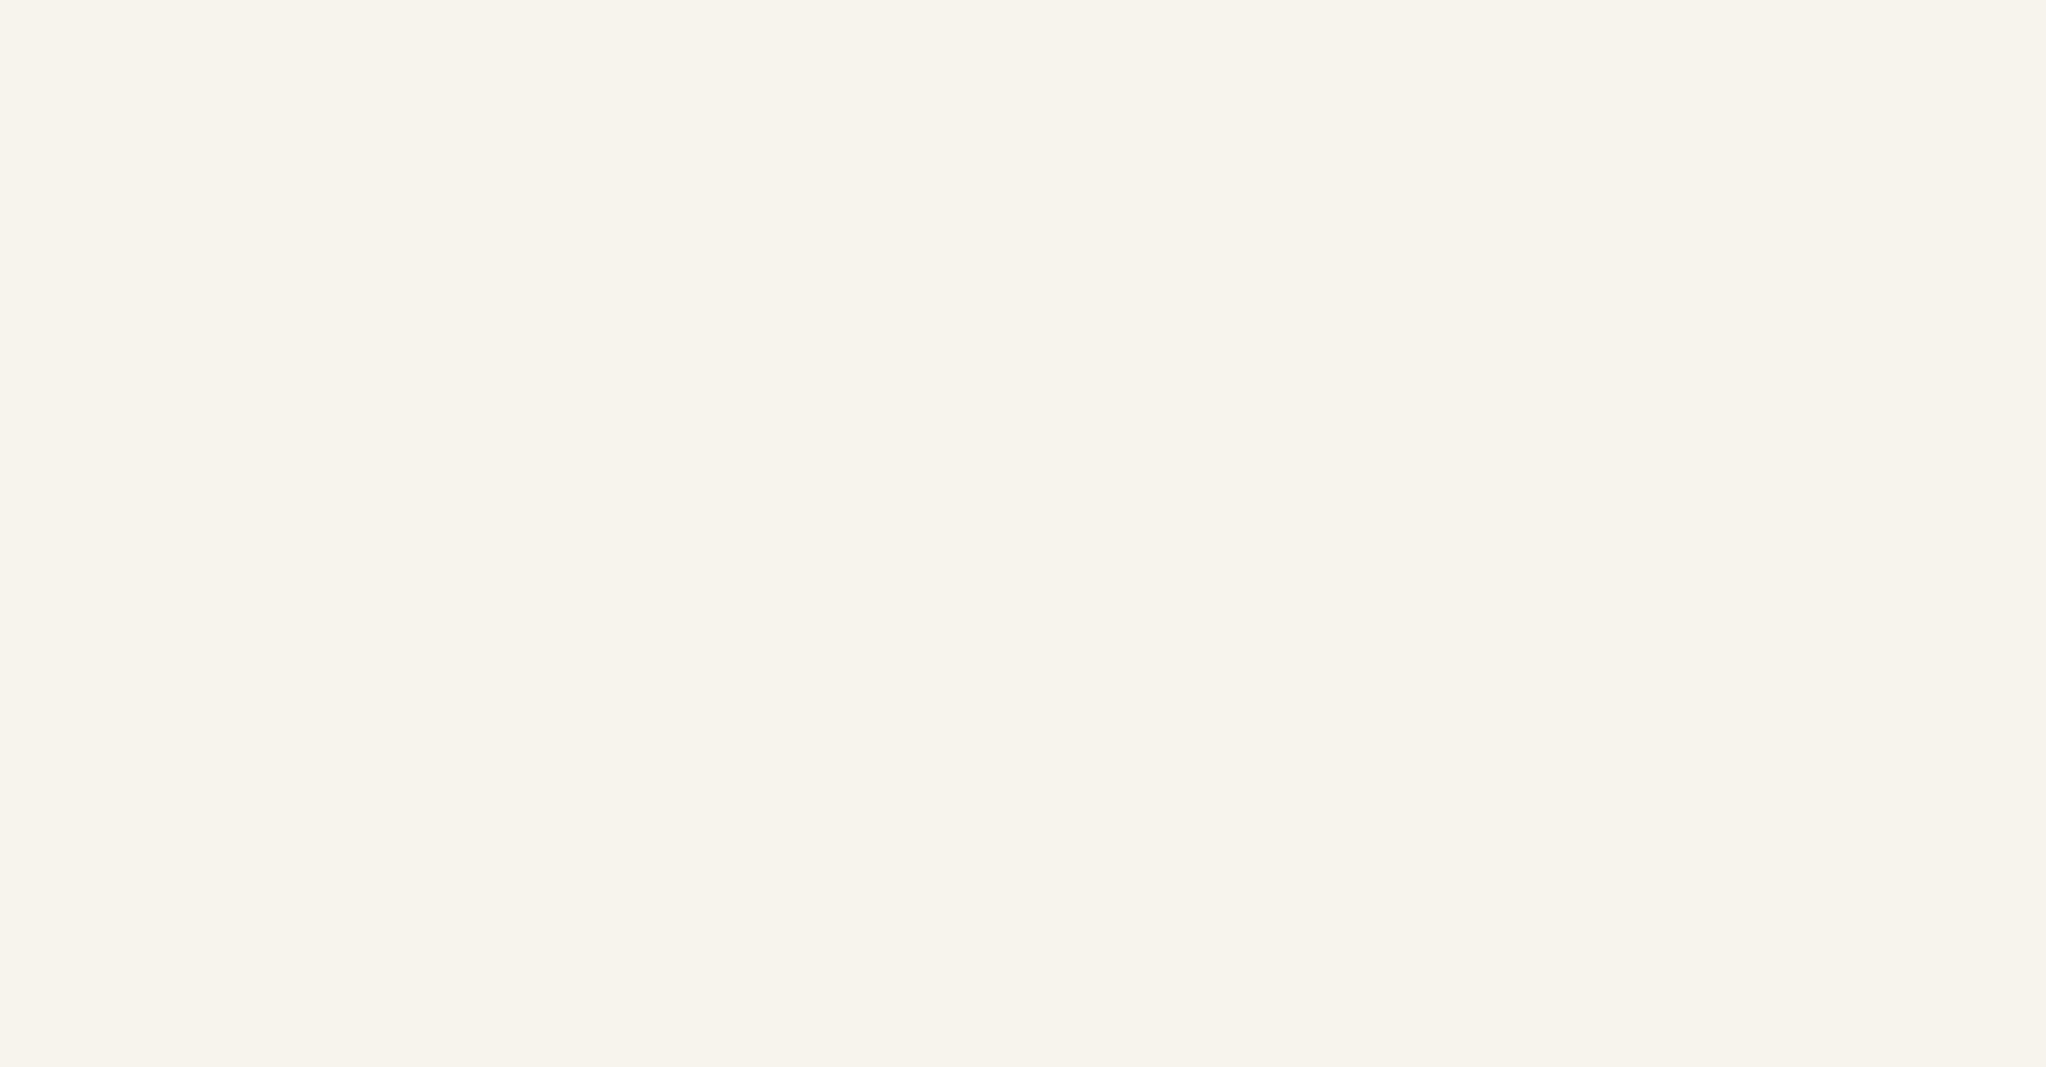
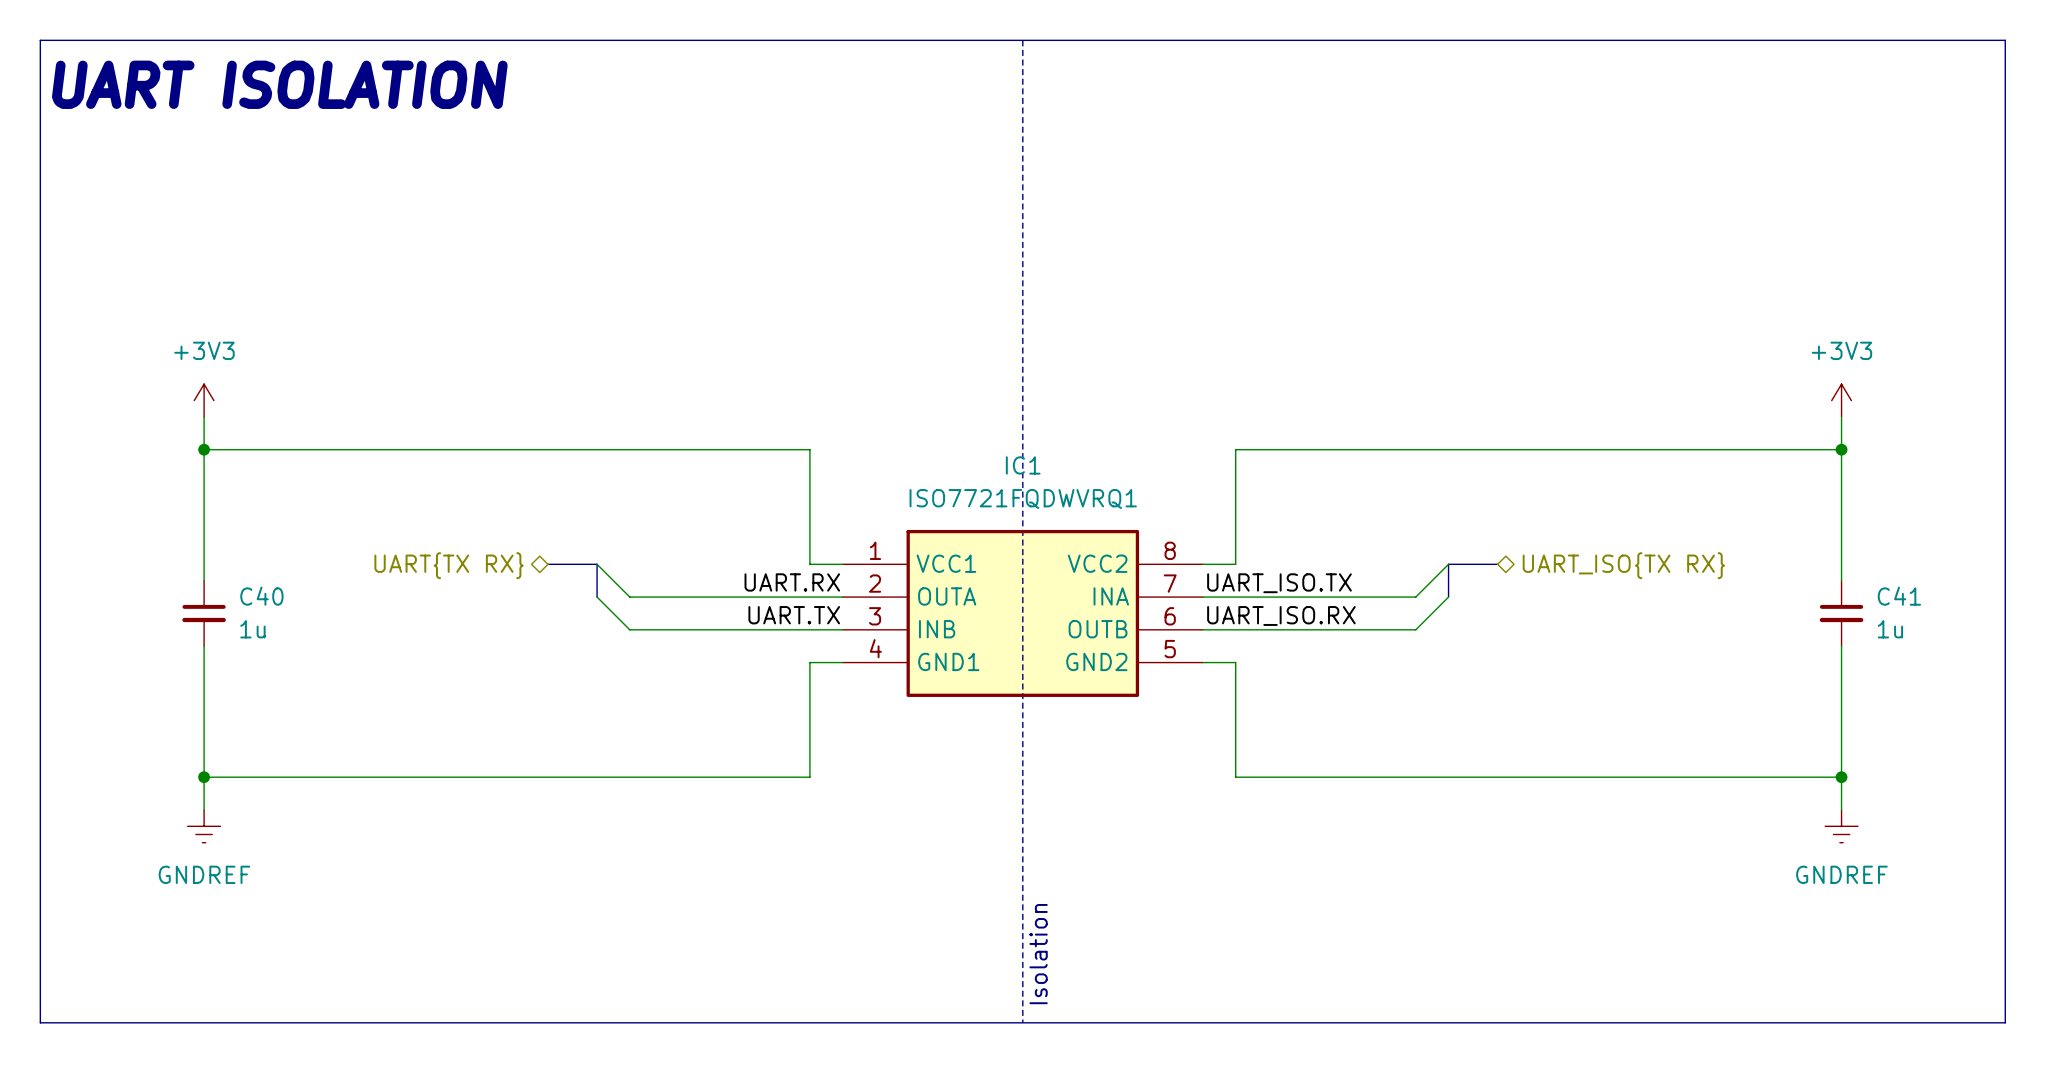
line: none -> (40, 40) (2005, 40) (2005, 1022) (40, 1022) (40, 40)
line: none -> (1022, 40) (1022, 1022)
text: none -> UART ISOLATION (279, 84)
power symbol: none -> +3V3 (204, 400)
power symbol: none -> +3V3 (1841, 400)
wire: none -> (204, 416) (204, 580)
wire: none -> (1841, 416) (1841, 580)
wire: none -> (204, 449) (809, 449) (809, 564) (842, 564)
junction: none -> (204, 449)
wire: none -> (1841, 449) (1235, 449) (1235, 564) (1202, 564)
junction: none -> (1841, 449)
bus: none -> (547, 564) (597, 564) (597, 597)
wire: none -> (597, 564) (629, 597) (842, 597)
wire: none -> (1448, 564) (1415, 597) (1202, 597)
bus: none -> (1497, 564) (1448, 564) (1448, 597)
hierarchical label: none -> UART{TX RX} (449, 565)
hierarchical label: none -> UART_ISO{TX RX} (1623, 565)
label: none -> UART.RX (792, 582)
label: none -> UART_ISO.TX (1279, 583)
wire: none -> (597, 597) (629, 629) (842, 629)
wire: none -> (1448, 597) (1415, 629) (1202, 629)
C40: none -> 1u (204, 613)
IC1: none -> ISO7721FQDWVRQ1 (1022, 613)
C41: none -> 1u (1841, 613)
label: none -> UART.TX (794, 615)
label: none -> UART_ISO.RX (1281, 615)
wire: none -> (204, 646) (204, 809)
wire: none -> (1841, 646) (1841, 809)
wire: none -> (842, 662) (809, 662) (809, 777) (204, 777)
wire: none -> (1202, 662) (1235, 662) (1235, 777) (1841, 777)
junction: none -> (204, 777)
junction: none -> (1841, 777)
power symbol: none -> GNDREF (204, 826)
power symbol: none -> GNDREF (1841, 826)
text: none -> Isolation (1038, 954)

